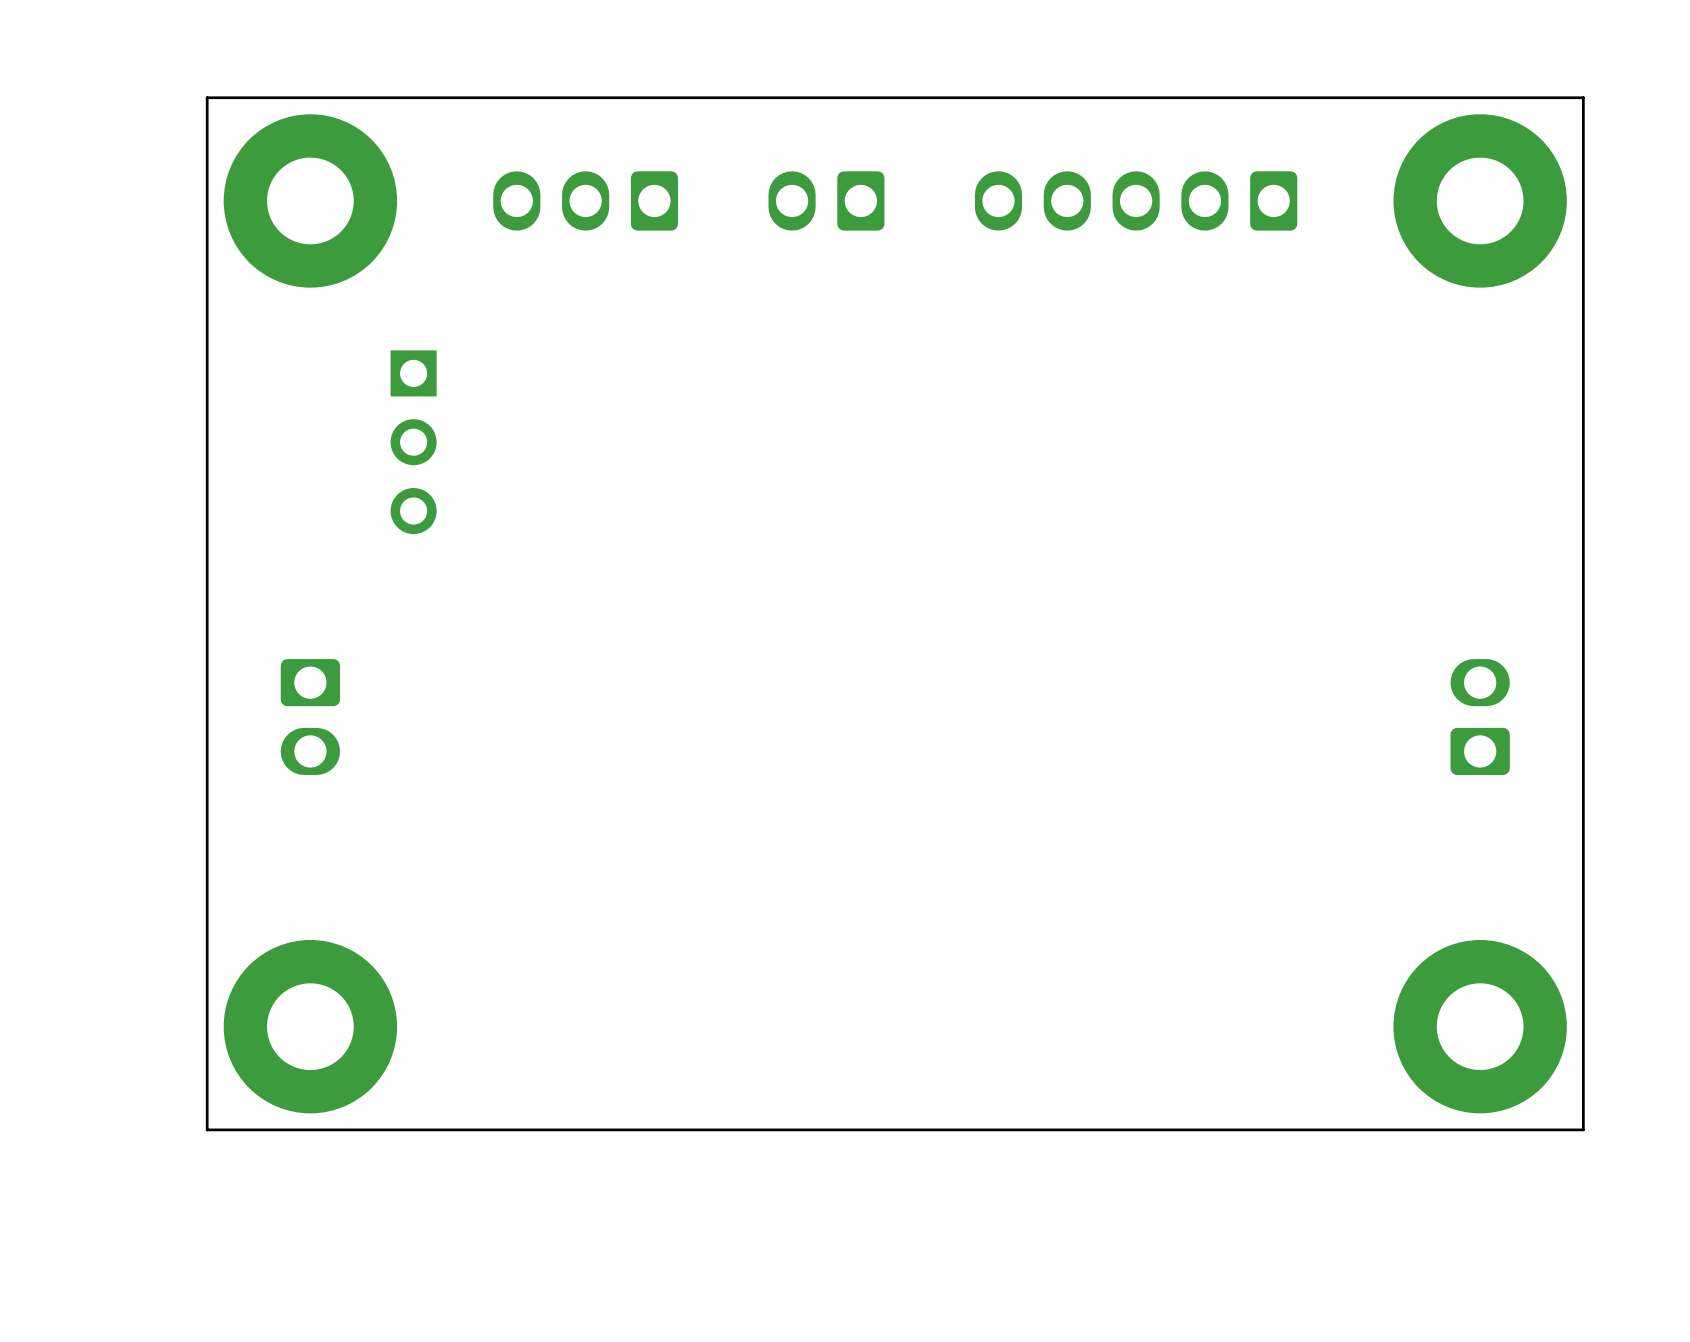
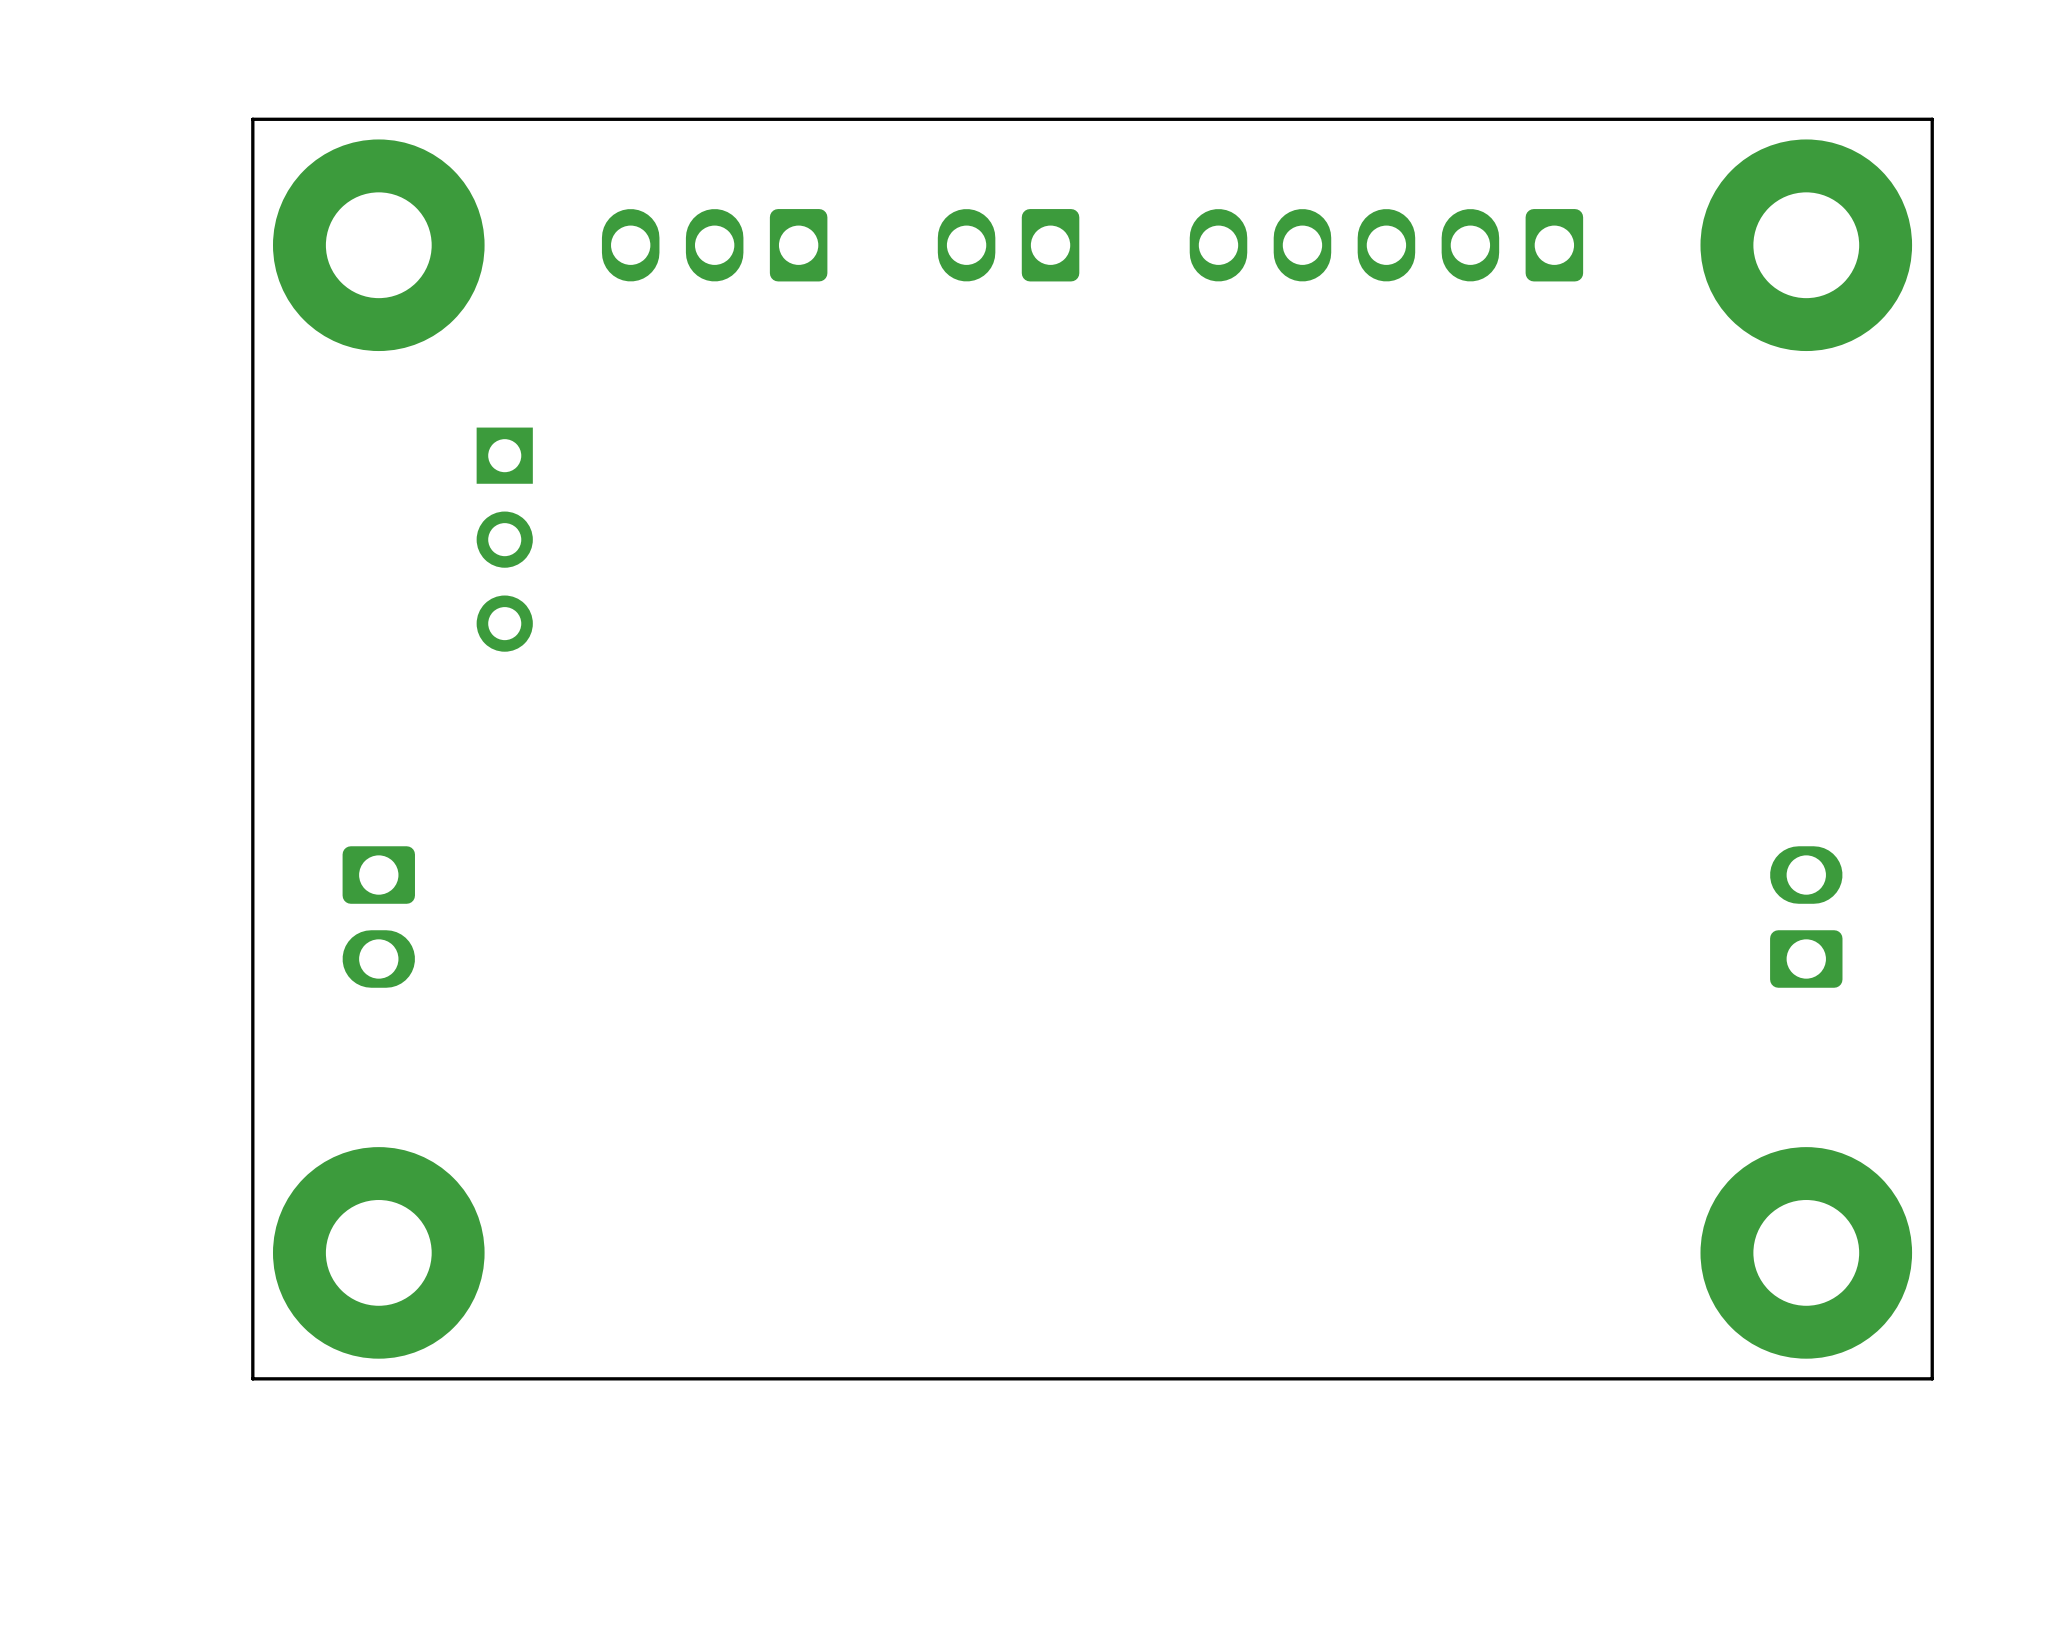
part position: (310, 717) -> (378, 917)
part position: (1480, 717) -> (1806, 917)

